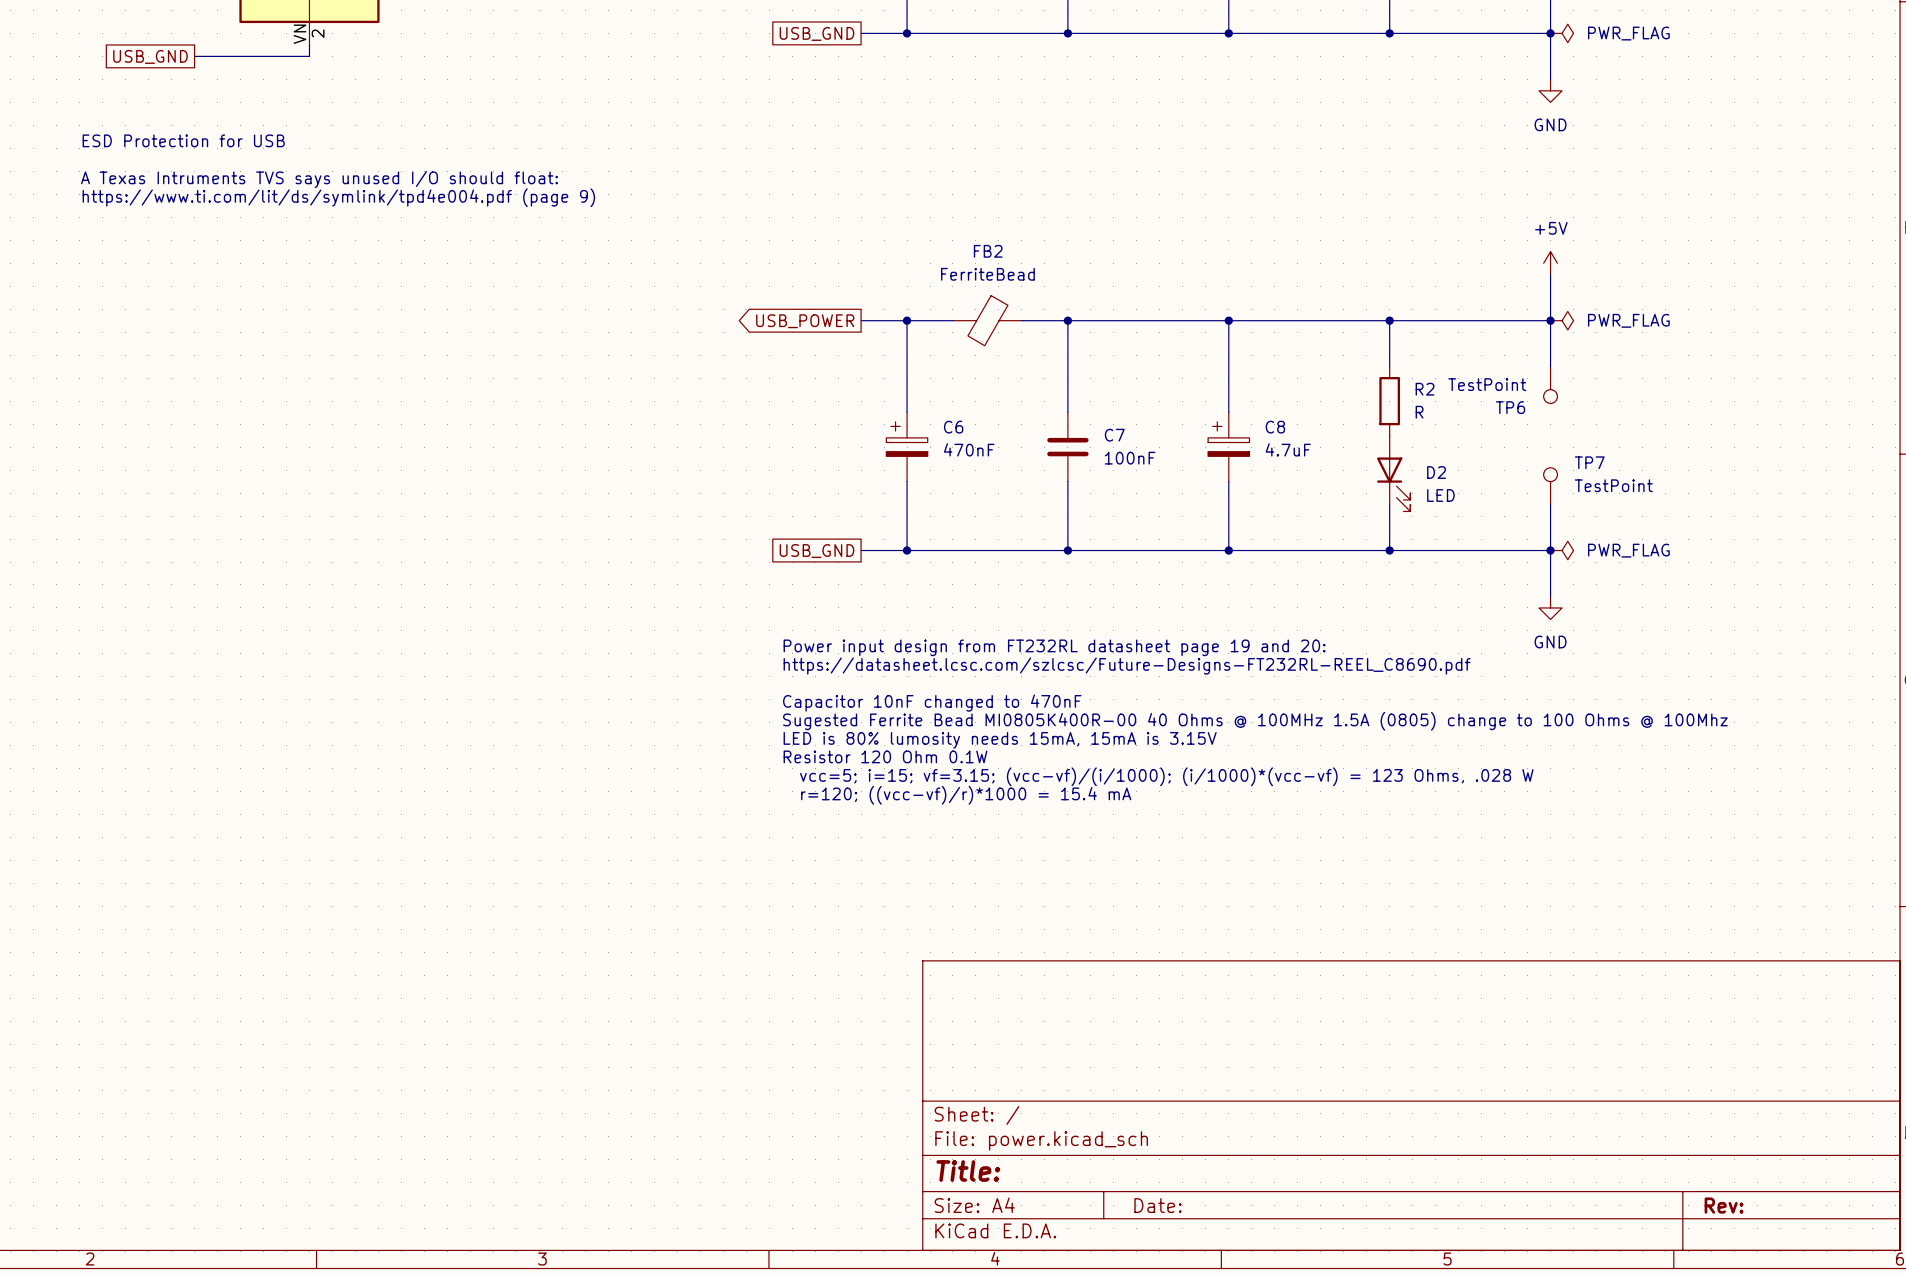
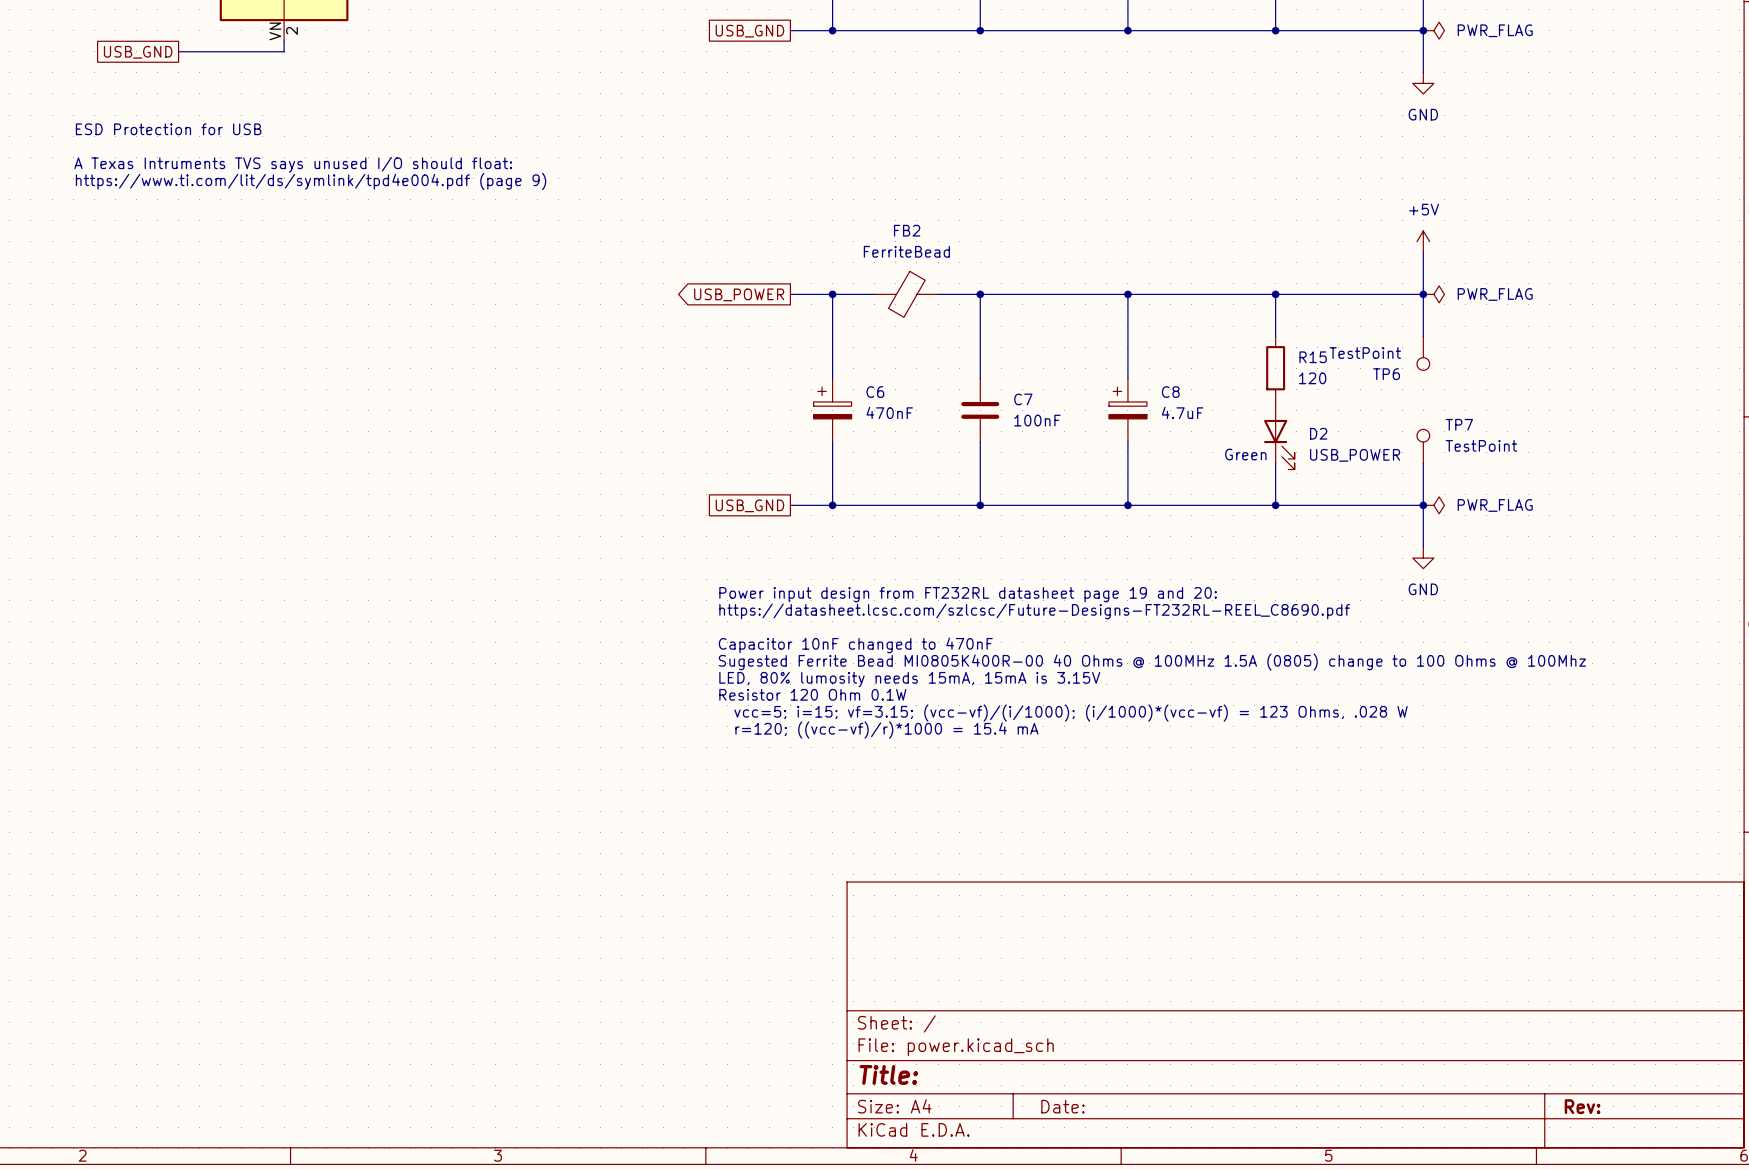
R2 name: R2 (1425, 389) -> R15 (1313, 357)
R2 value: R (1419, 412) -> 120 (1312, 378)
text: none -> Green (1245, 454)
D2 value: LED (1440, 495) -> USB_POWER (1355, 455)
text: LED is 80% lumosity needs 15mA, 15mA is 3.15V (1000, 740) -> LED, 80% lumosity needs 15mA, 15mA is 3.15V (909, 679)

